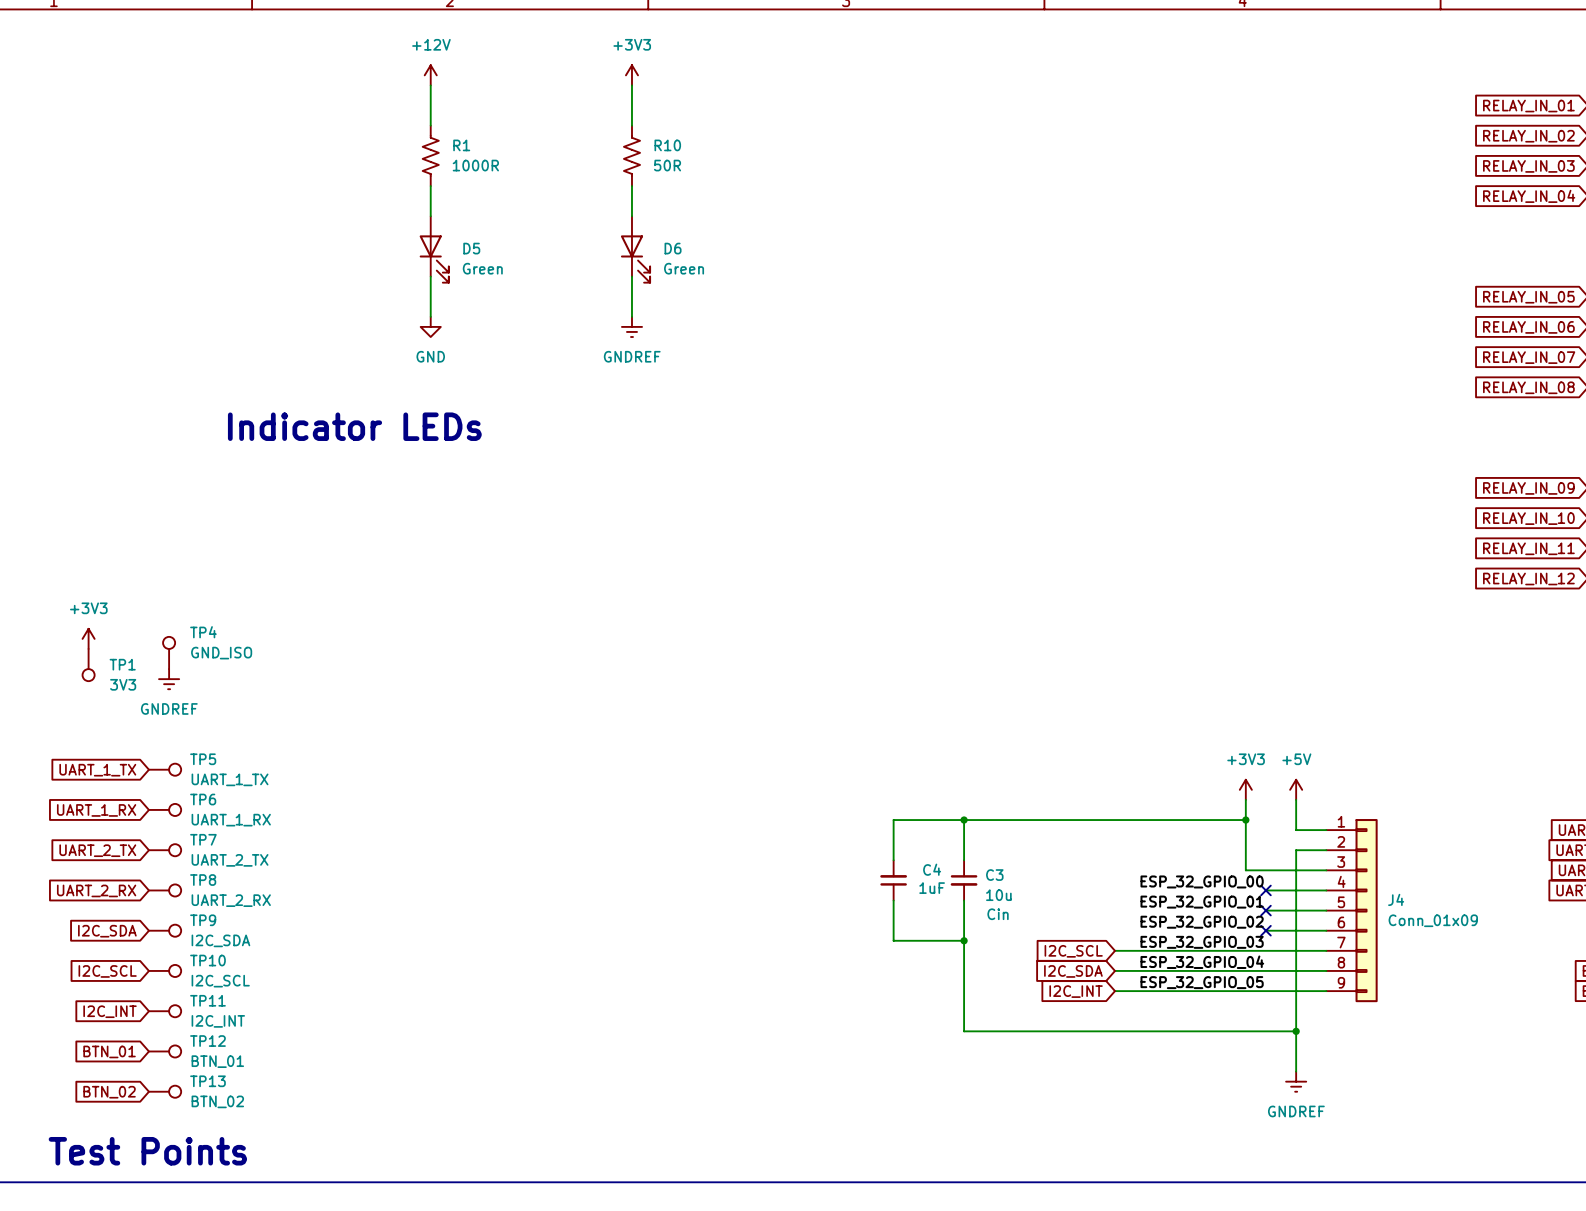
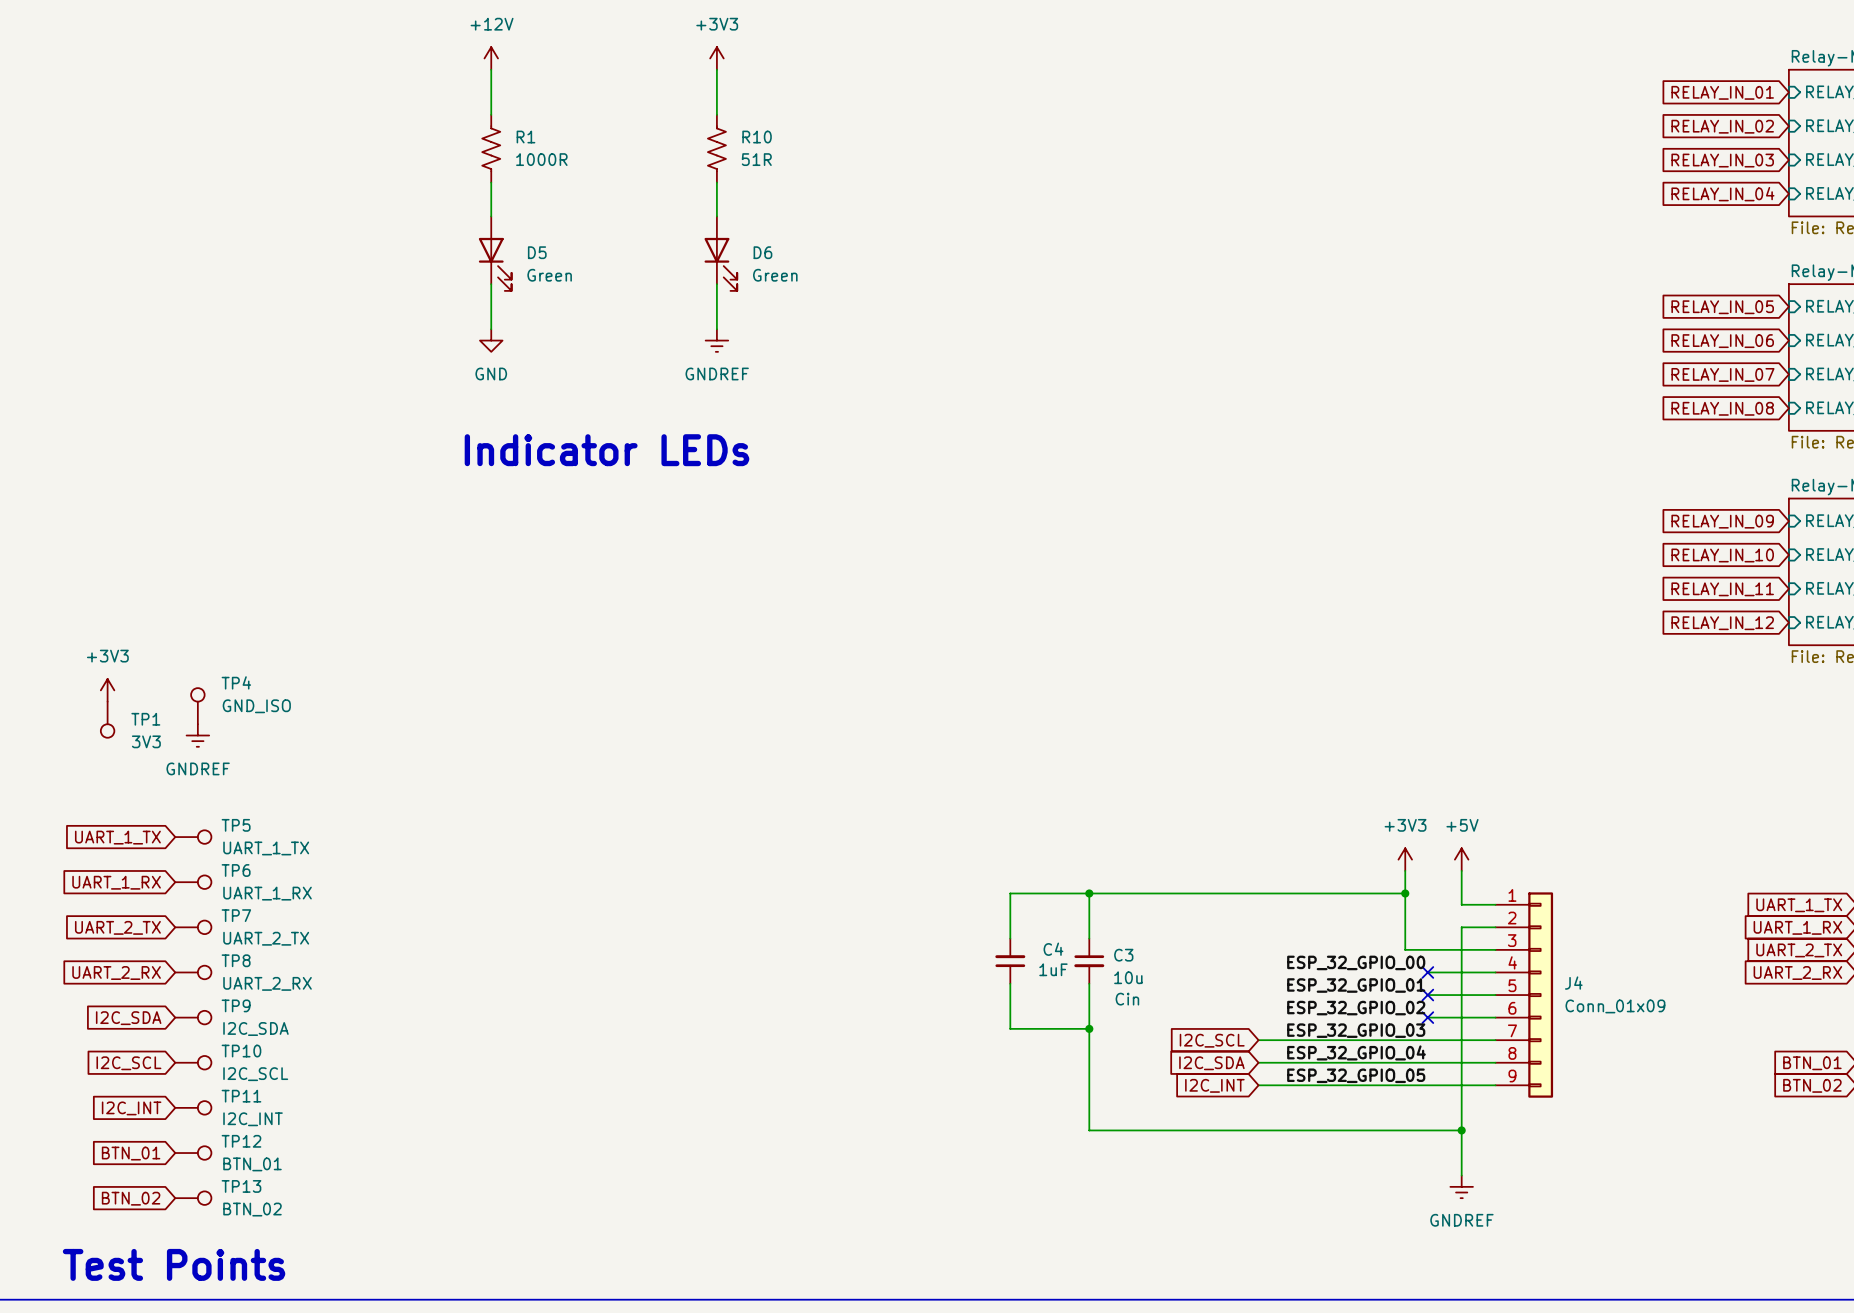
R10 value: 50R (667, 165) -> 51R (756, 159)
text position: Indicator LEDs (354, 426) -> Indicator LEDs (606, 450)

